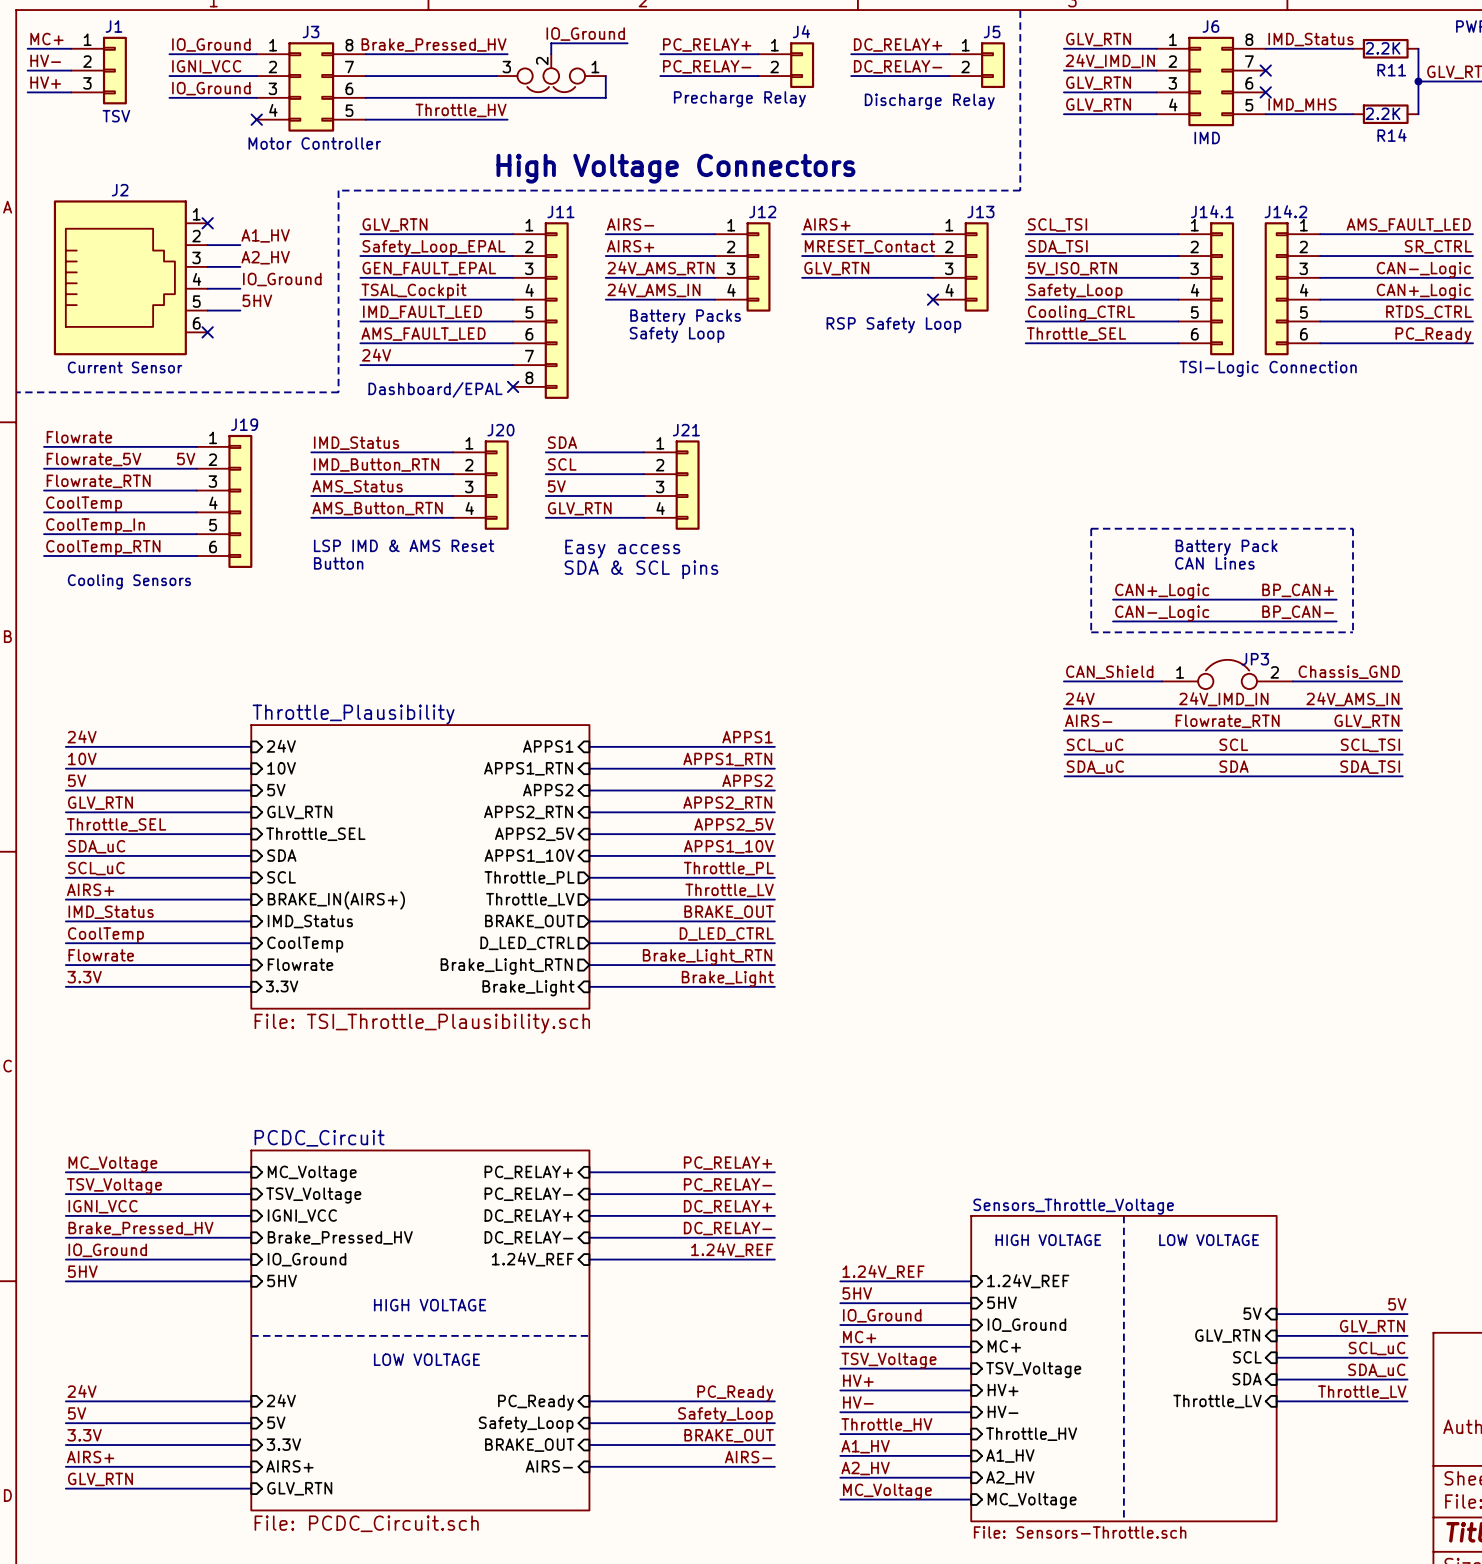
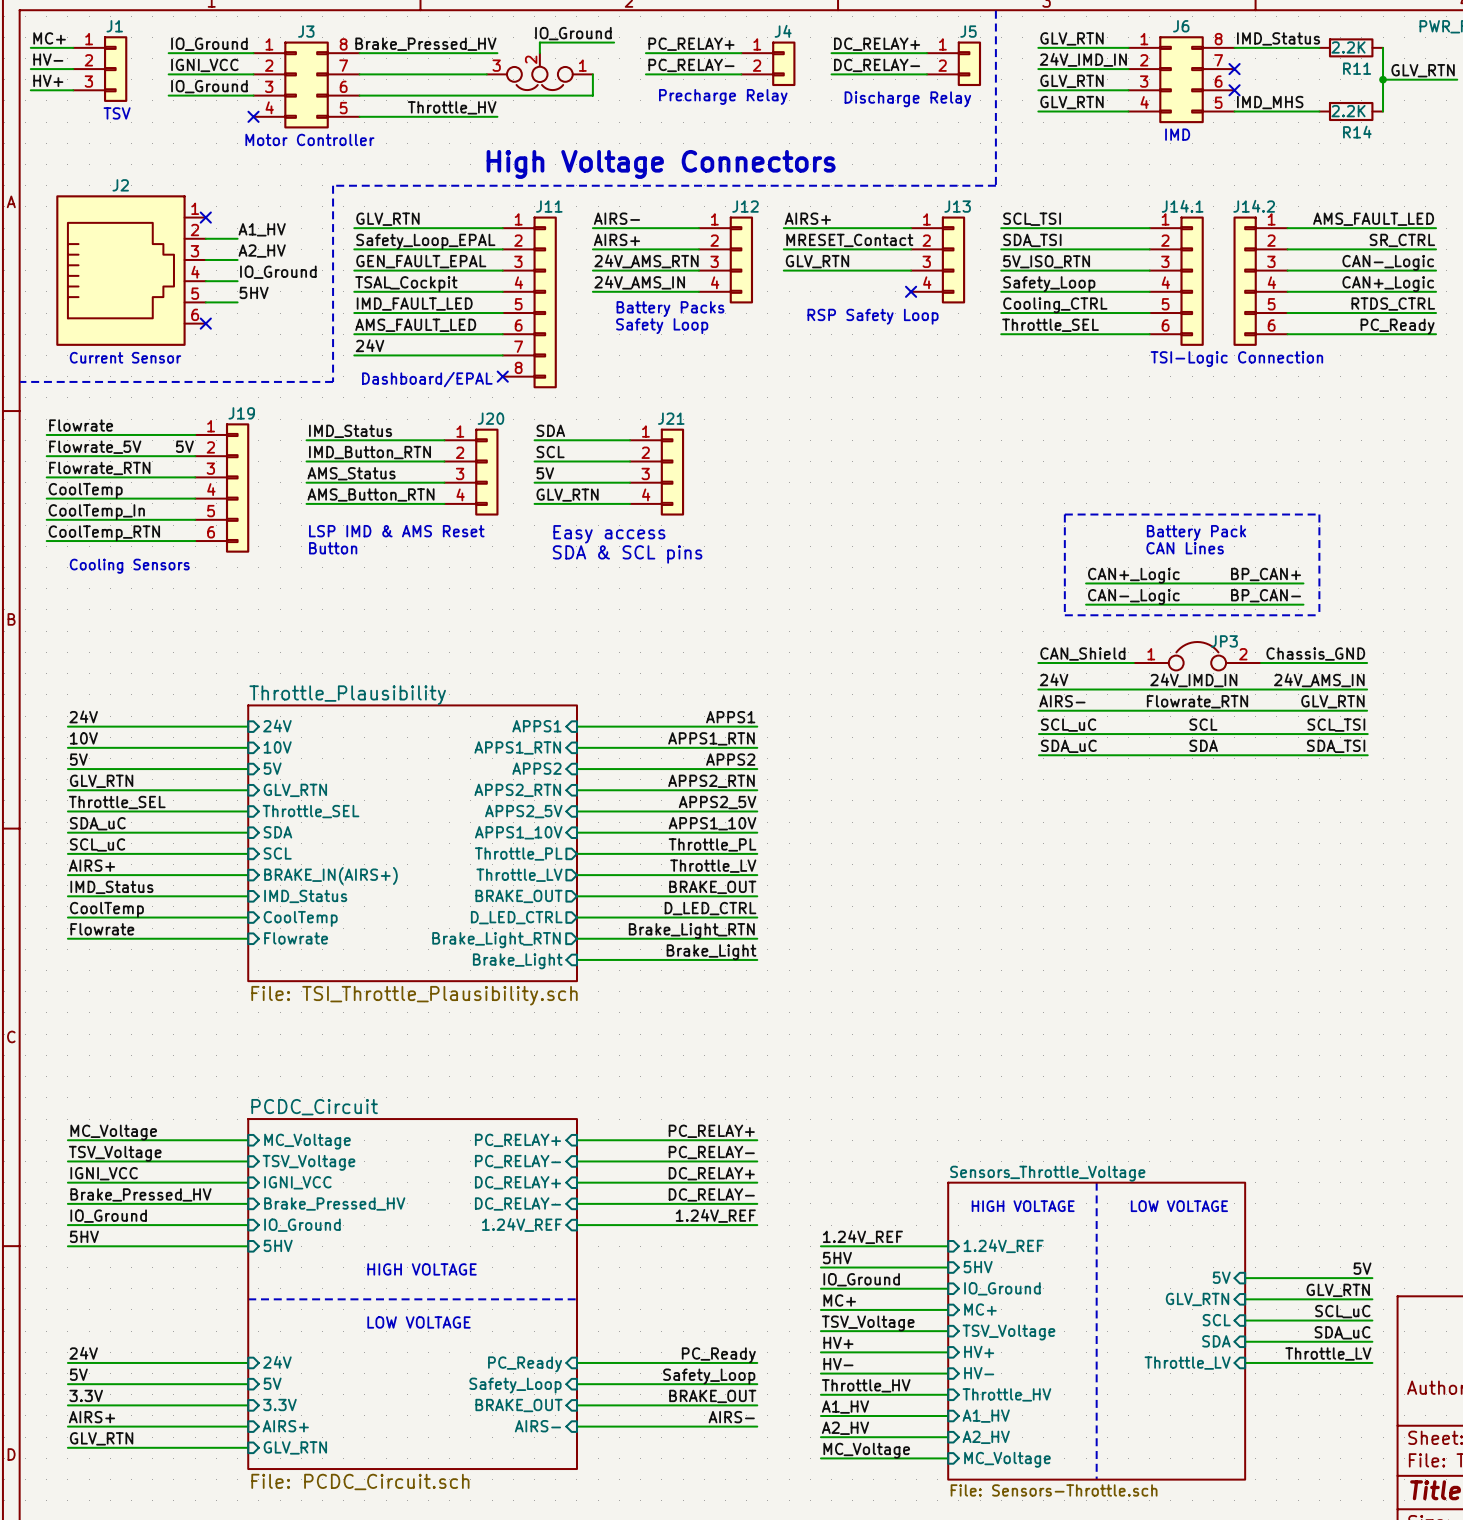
label: 3.3V (84, 977) -> none
wire: (65, 986) (251, 986) -> none
sheet pin: 3.3V (282, 986) -> none

